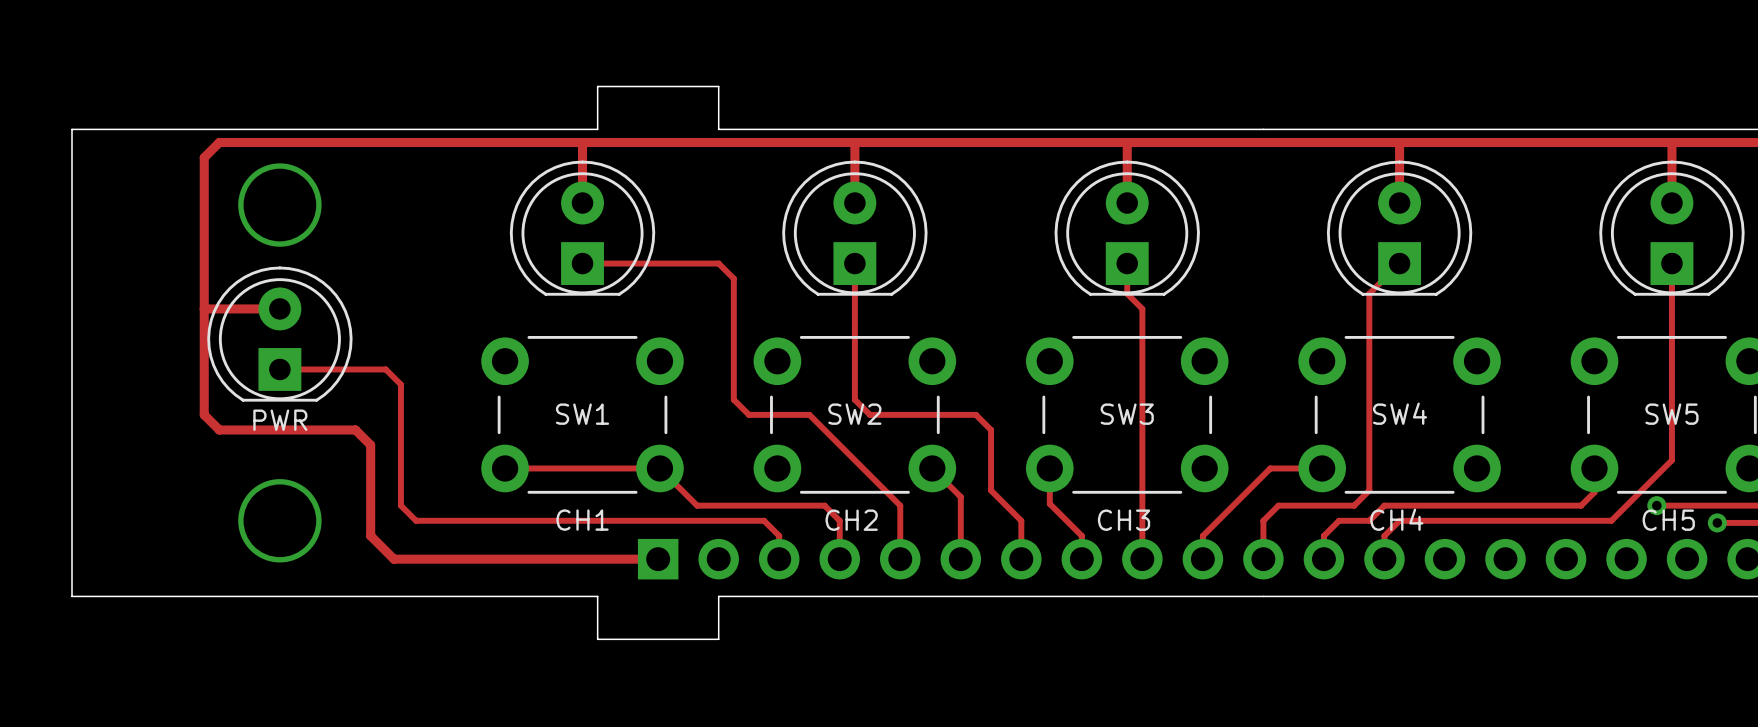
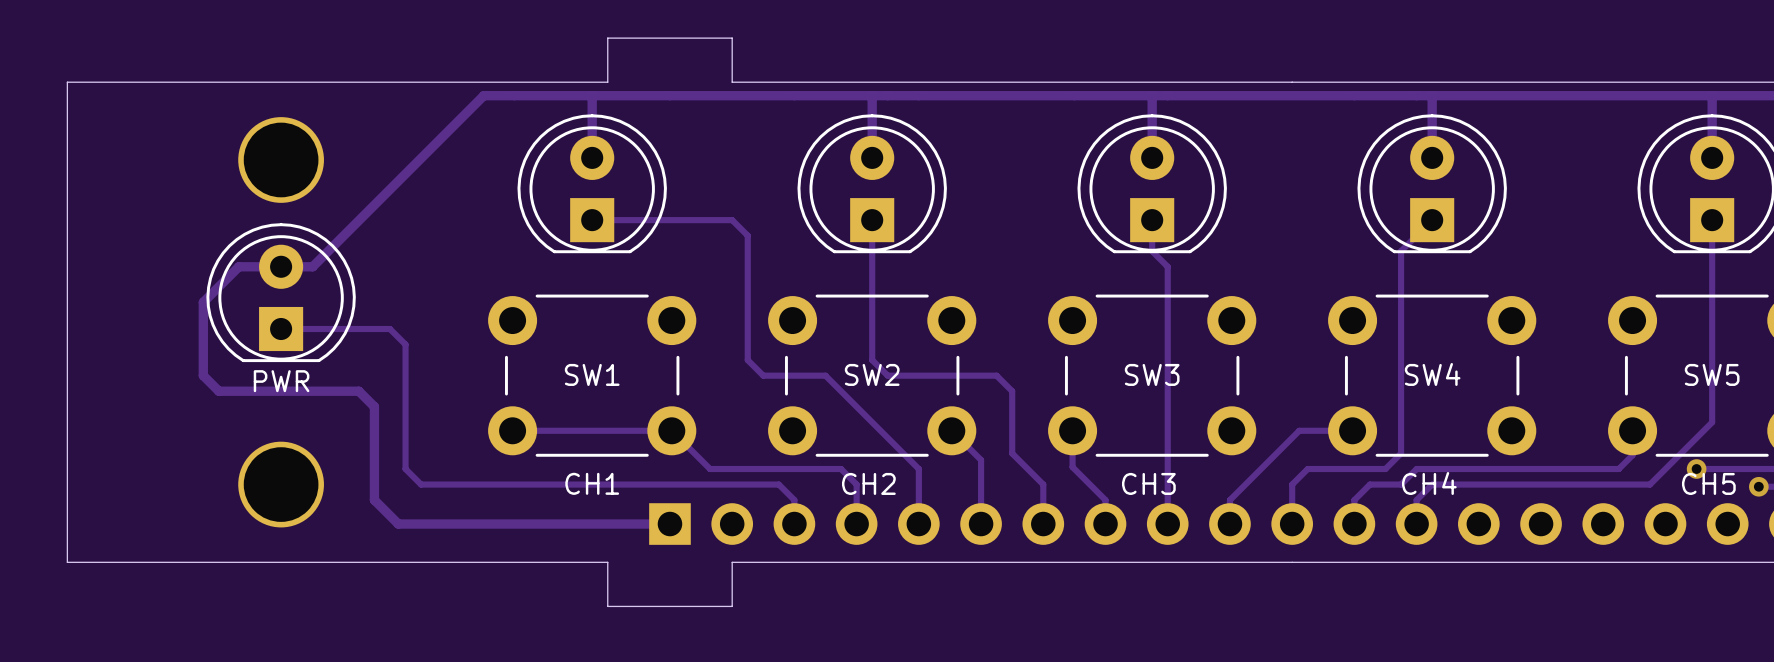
track: (477, 142) (219, 142) (204, 157) (204, 343) -> (483, 95) (312, 266) (281, 266)
track: (204, 308) (238, 308) -> (203, 302) (238, 266)

